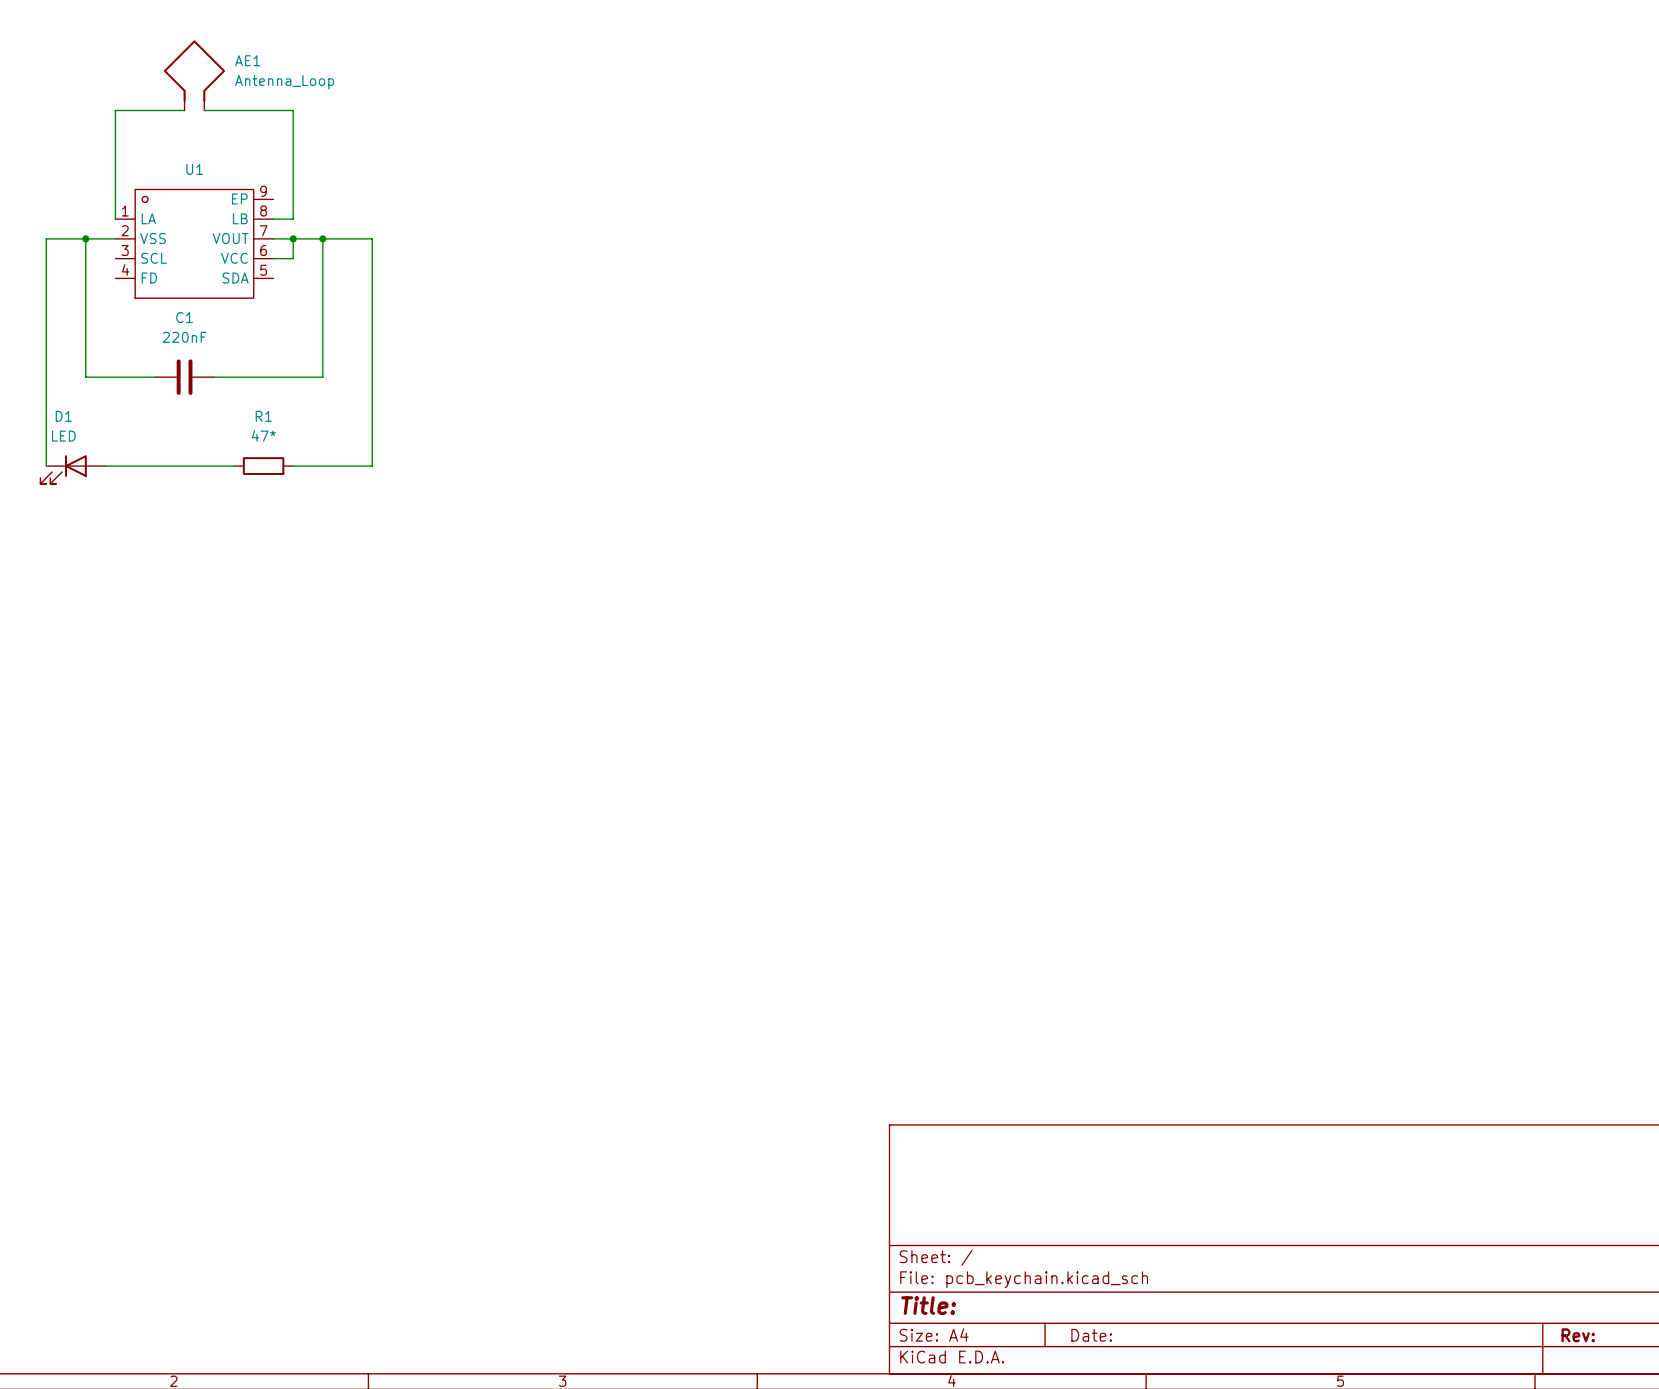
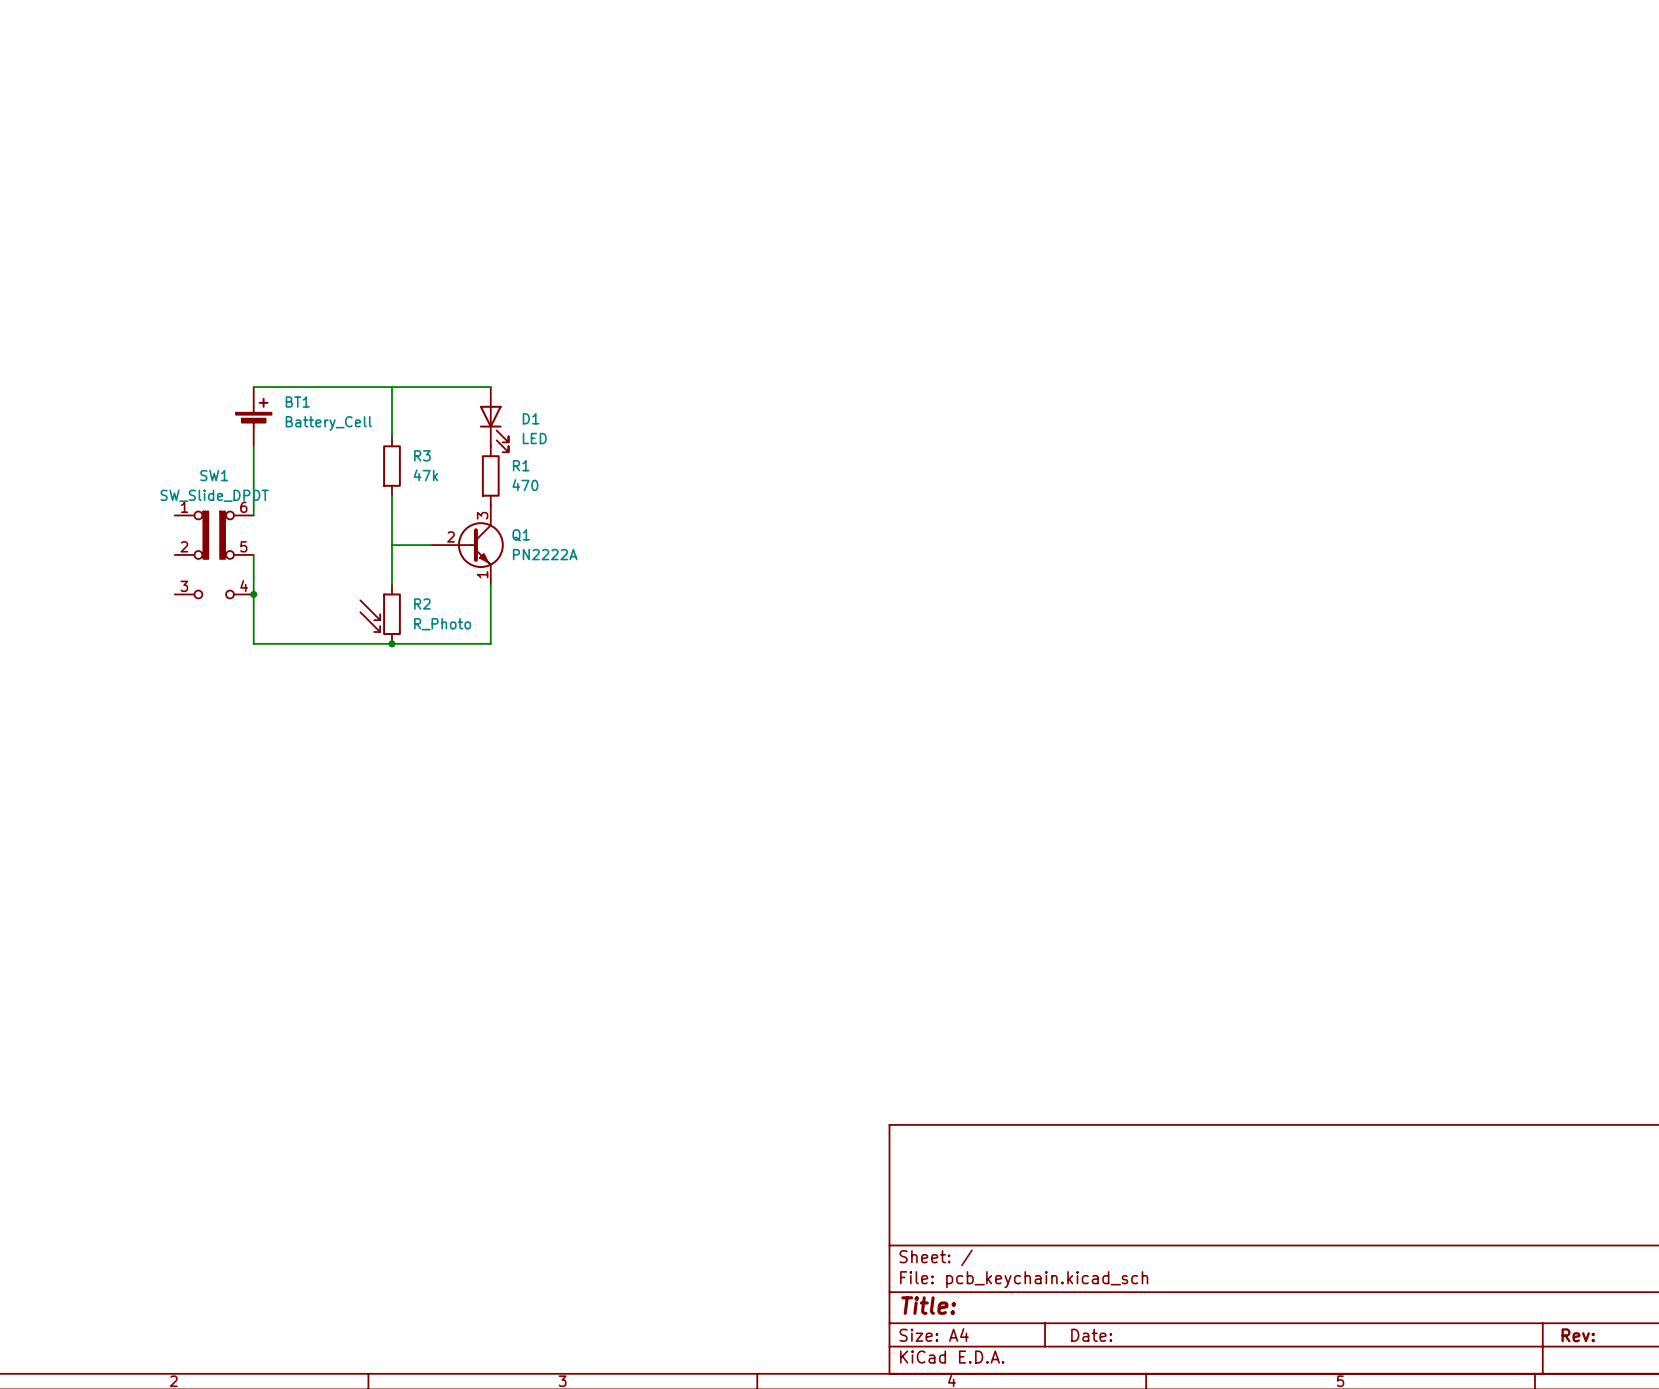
AE1: Antenna_Loop (194, 75) -> none
wire: (184, 110) (115, 110) (115, 219) -> none
wire: (204, 110) (293, 110) (293, 219) (273, 219) -> none
wire: (85, 238) (85, 377) (154, 377) -> none
junction: (85, 238) -> none
wire: (115, 238) (46, 238) (46, 466) -> none
wire: (273, 238) (372, 238) (372, 466) (293, 466) -> none
wire: (293, 238) (293, 258) (273, 258) -> none
junction: (293, 238) -> none
wire: (322, 238) (322, 377) (214, 377) -> none
junction: (322, 238) -> none
U1: (194, 243) -> none
C1: 220nF (184, 377) -> none
wire: none -> (253, 387) (490, 387)
wire: none -> (391, 387) (391, 436)
D1 name position: D1 (63, 416) -> D1 (531, 418)
BT1: none -> Battery_Cell (253, 416)
R1 name position: R1 (263, 416) -> R1 (521, 465)
R1 value: 47* (263, 435) -> 470 (525, 485)
D1 value position: LED (63, 436) -> LED (534, 438)
wire: none -> (253, 446) (253, 515)
wire: (105, 466) (233, 466) -> none
R1 rotation: 0° (263, 466) -> 90° clockwise (490, 475)
R1 position: (263, 466) -> (490, 475)
R3: none -> 47k (391, 466)
D1 rotation: 0° (63, 469) -> 90° counterclockwise (494, 429)
D1 position: (72, 469) -> (494, 419)
wire: none -> (391, 495) (391, 584)
wire: none -> (391, 545) (431, 545)
Q1: none -> PN2222A (467, 545)
SW1: none -> SW_Slide_DPDT (214, 554)
wire: none -> (253, 554) (253, 643) (490, 643) (490, 584)
junction: none -> (253, 594)
R2: none -> R_Photo (380, 614)
junction: none -> (391, 643)

